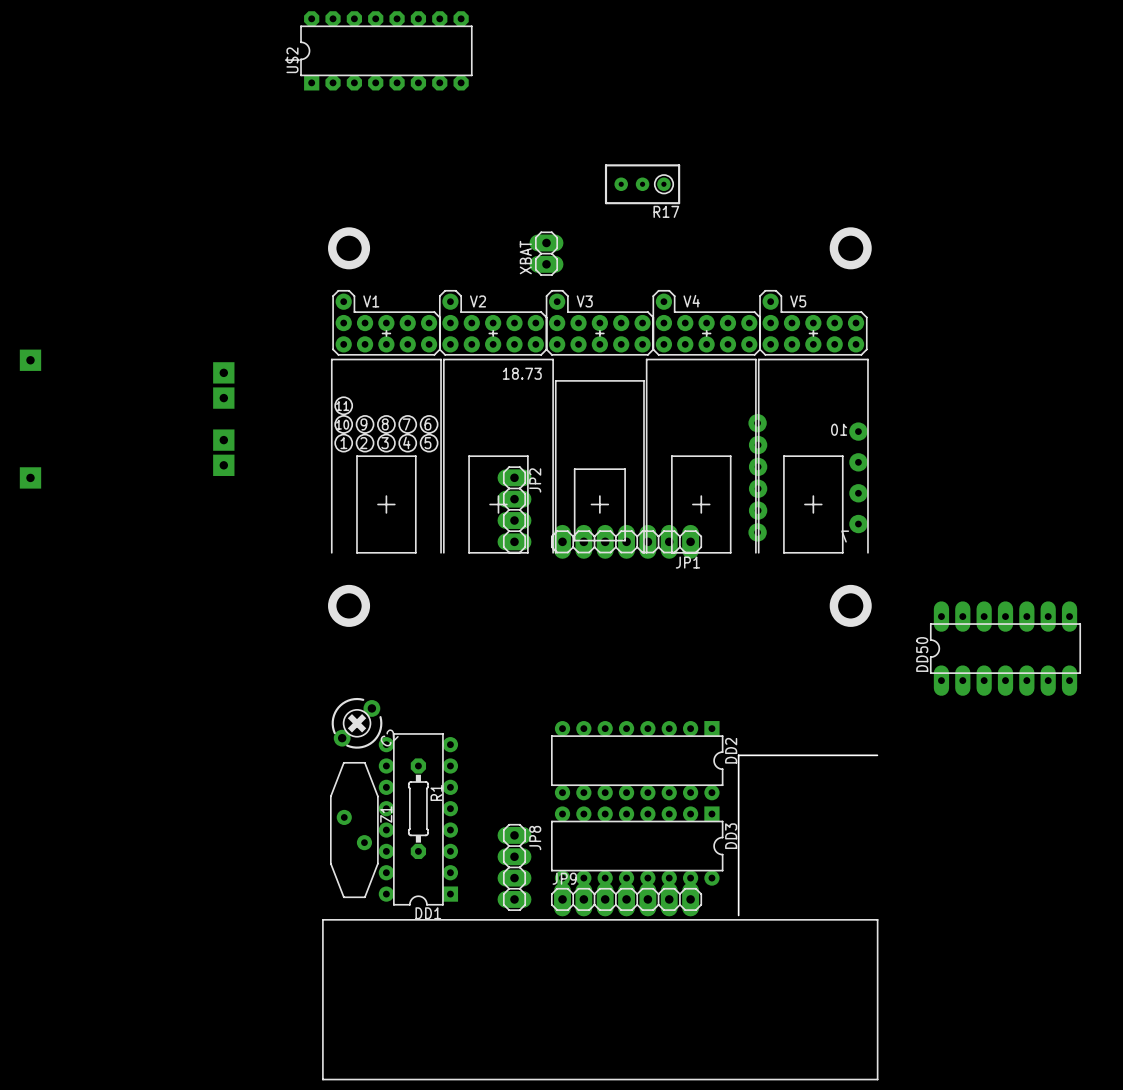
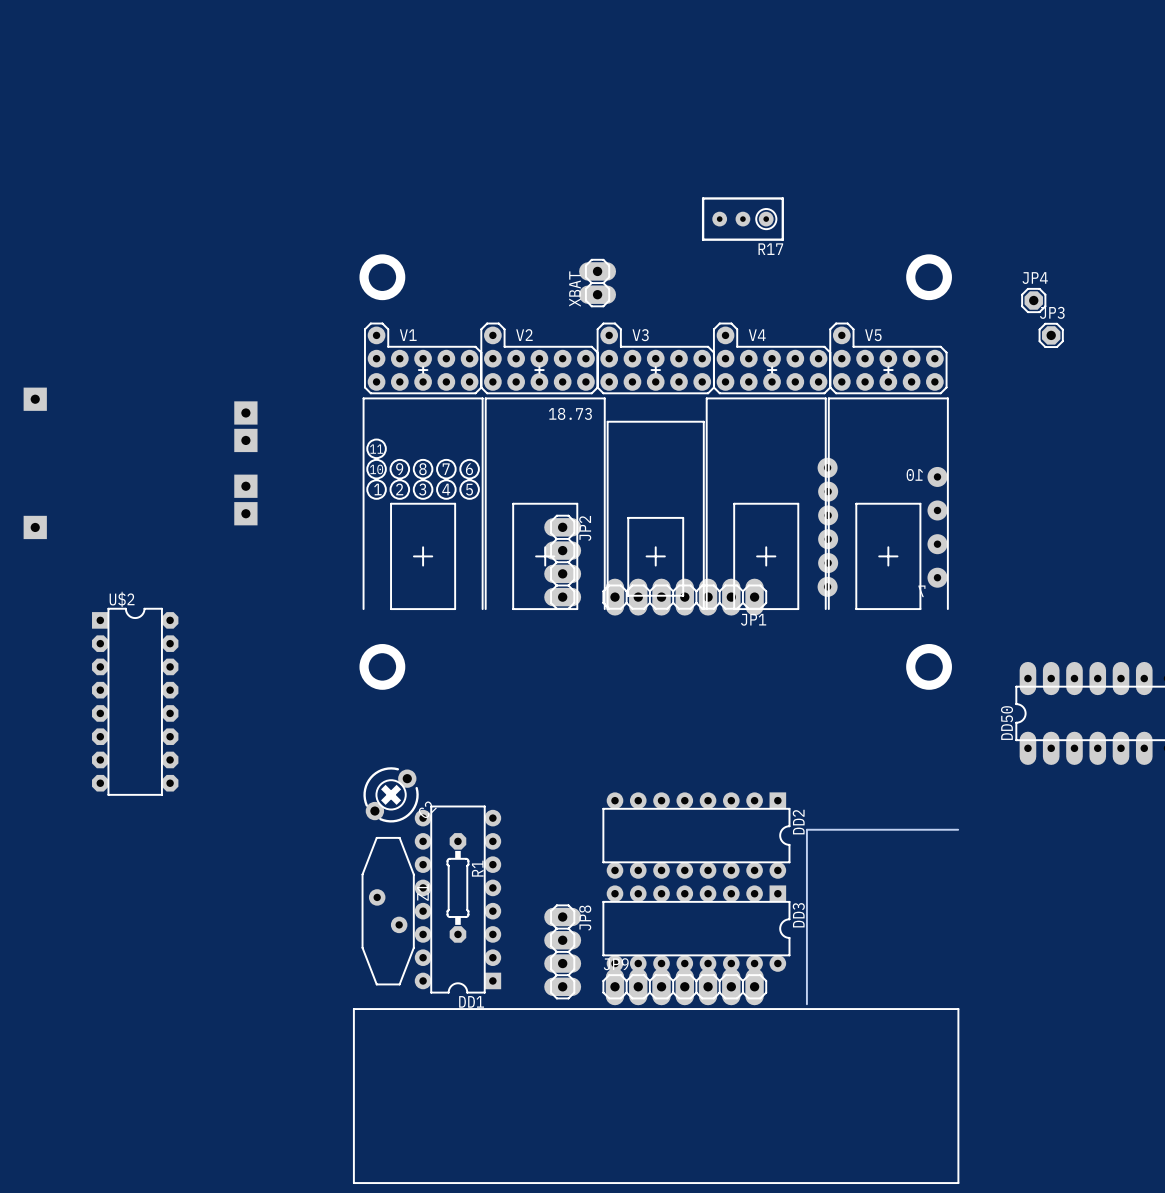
U$2 rotation: 0° (386, 50) -> 90° clockwise (135, 701)
U$2 position: (386, 50) -> (135, 701)
R17 position: (642, 184) -> (742, 219)
JP4: none -> (1033, 300)
JP3: none -> (1051, 335)

